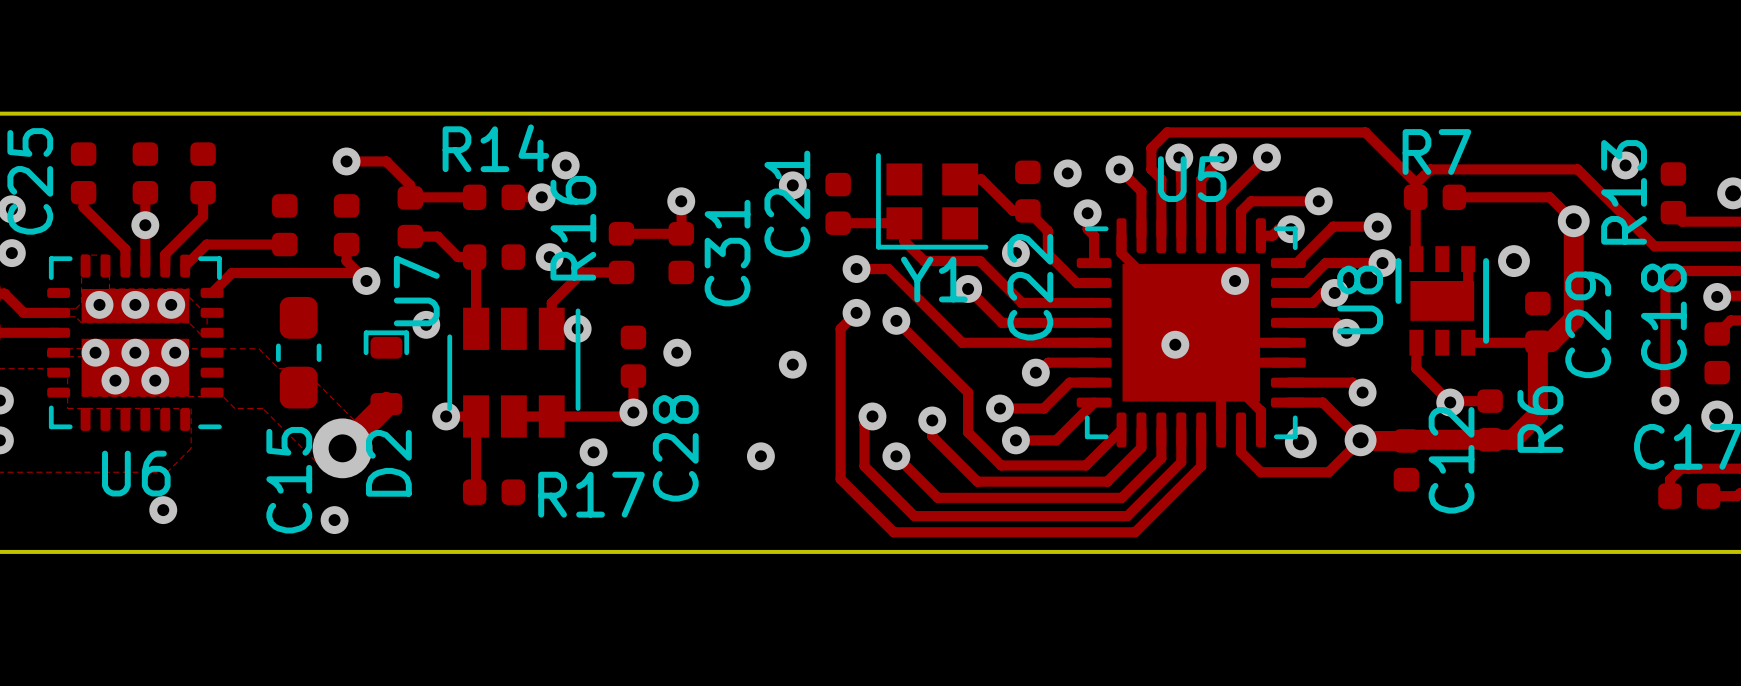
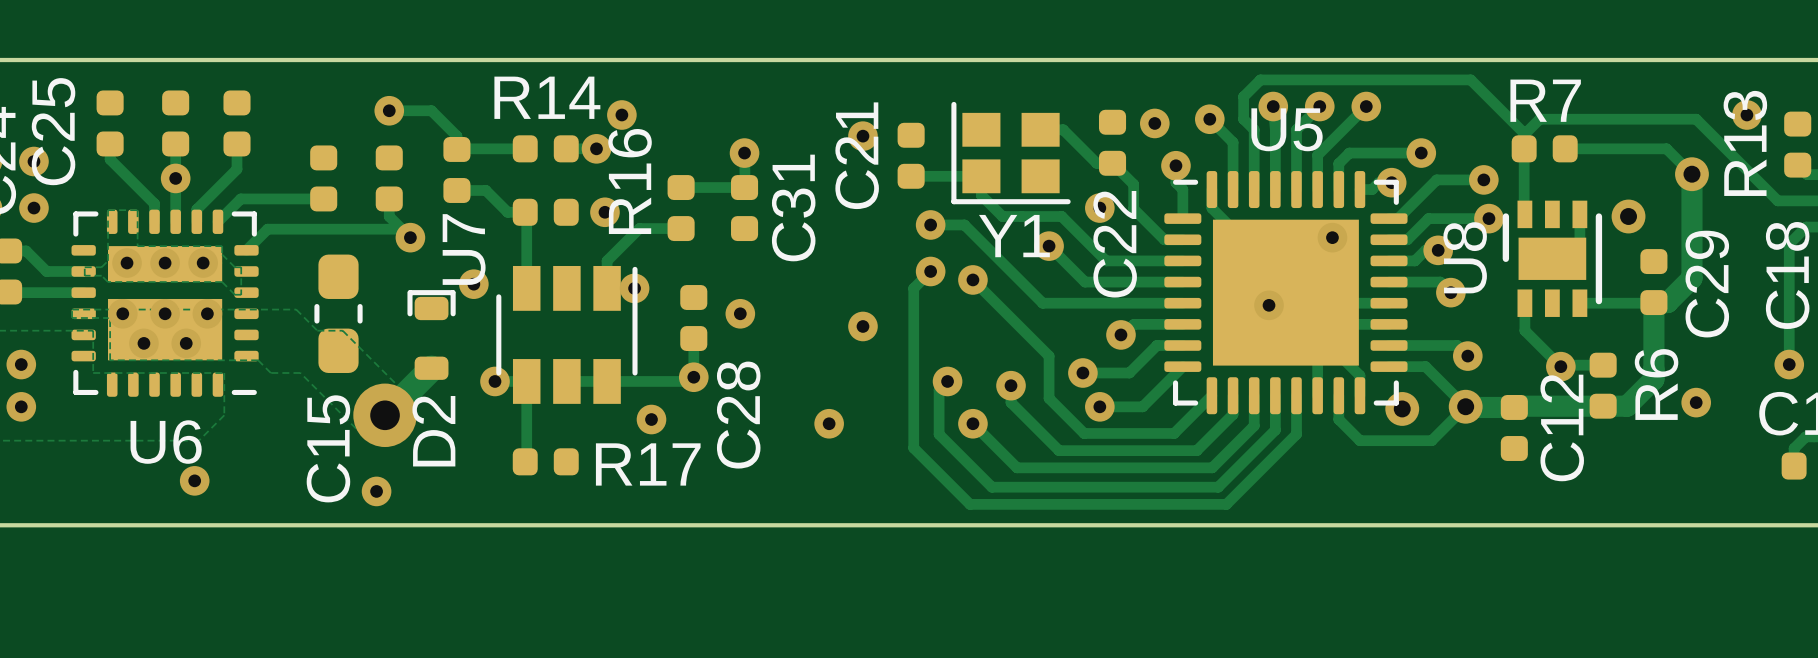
via: none -> (1696, 402)

